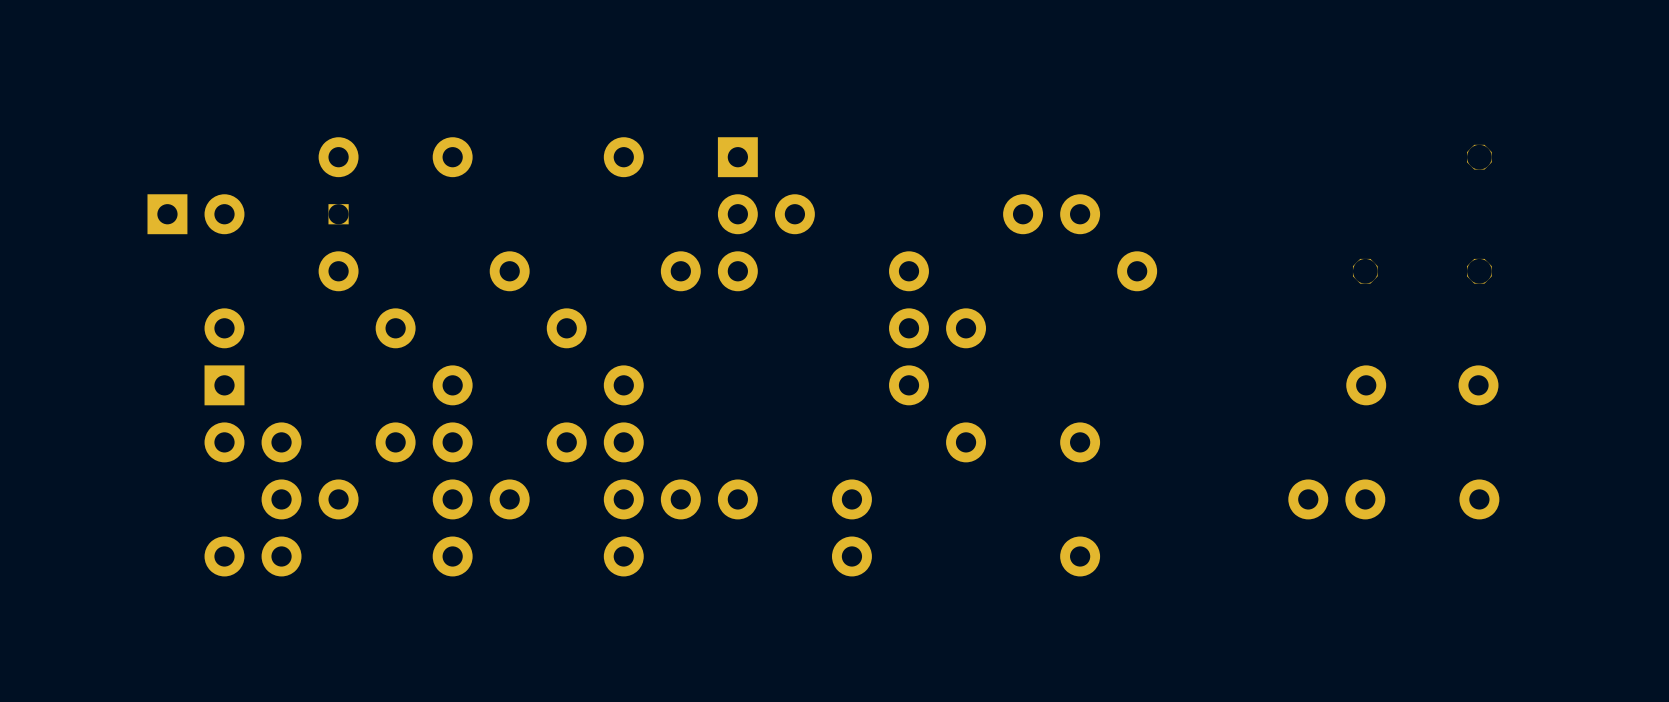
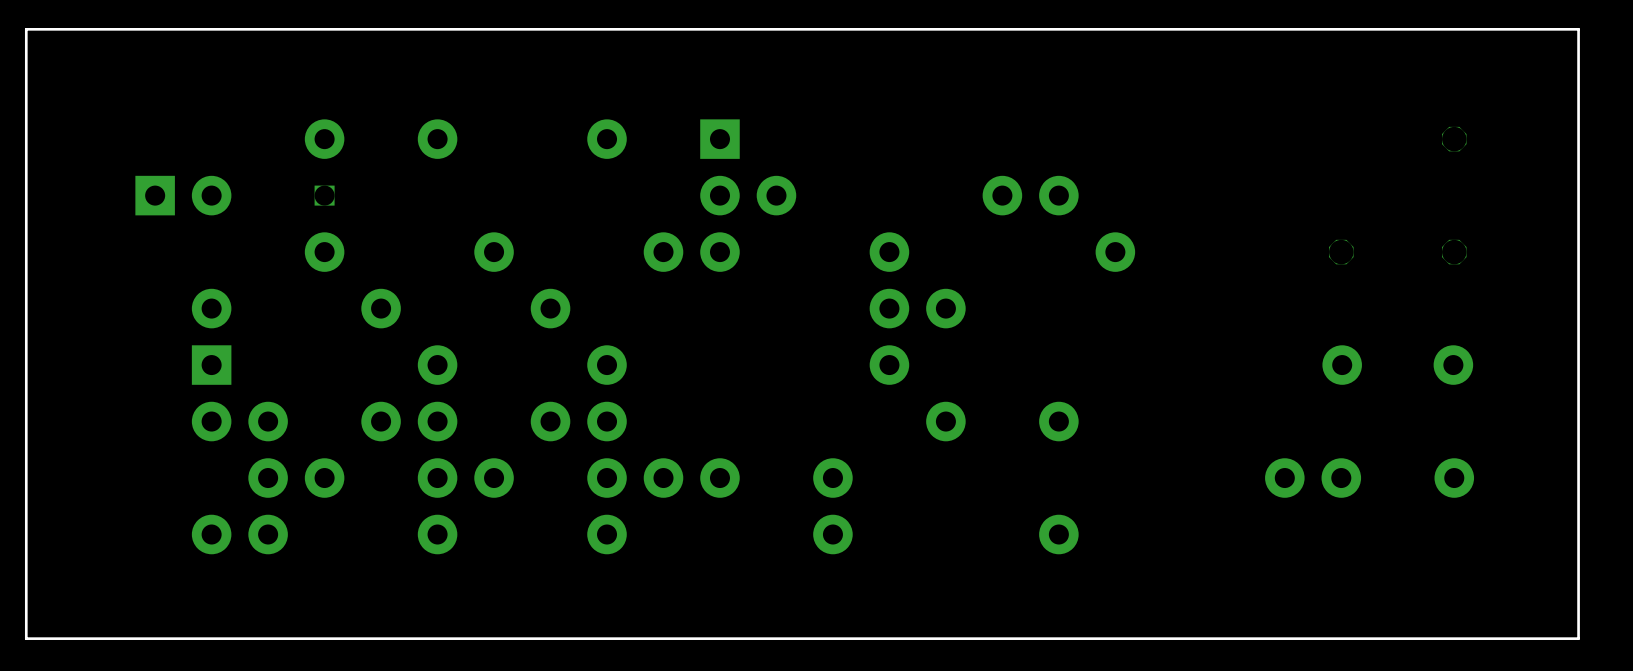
board edge: none -> (1578, 29) (26, 29) (26, 638) (1578, 638) (1578, 29)

